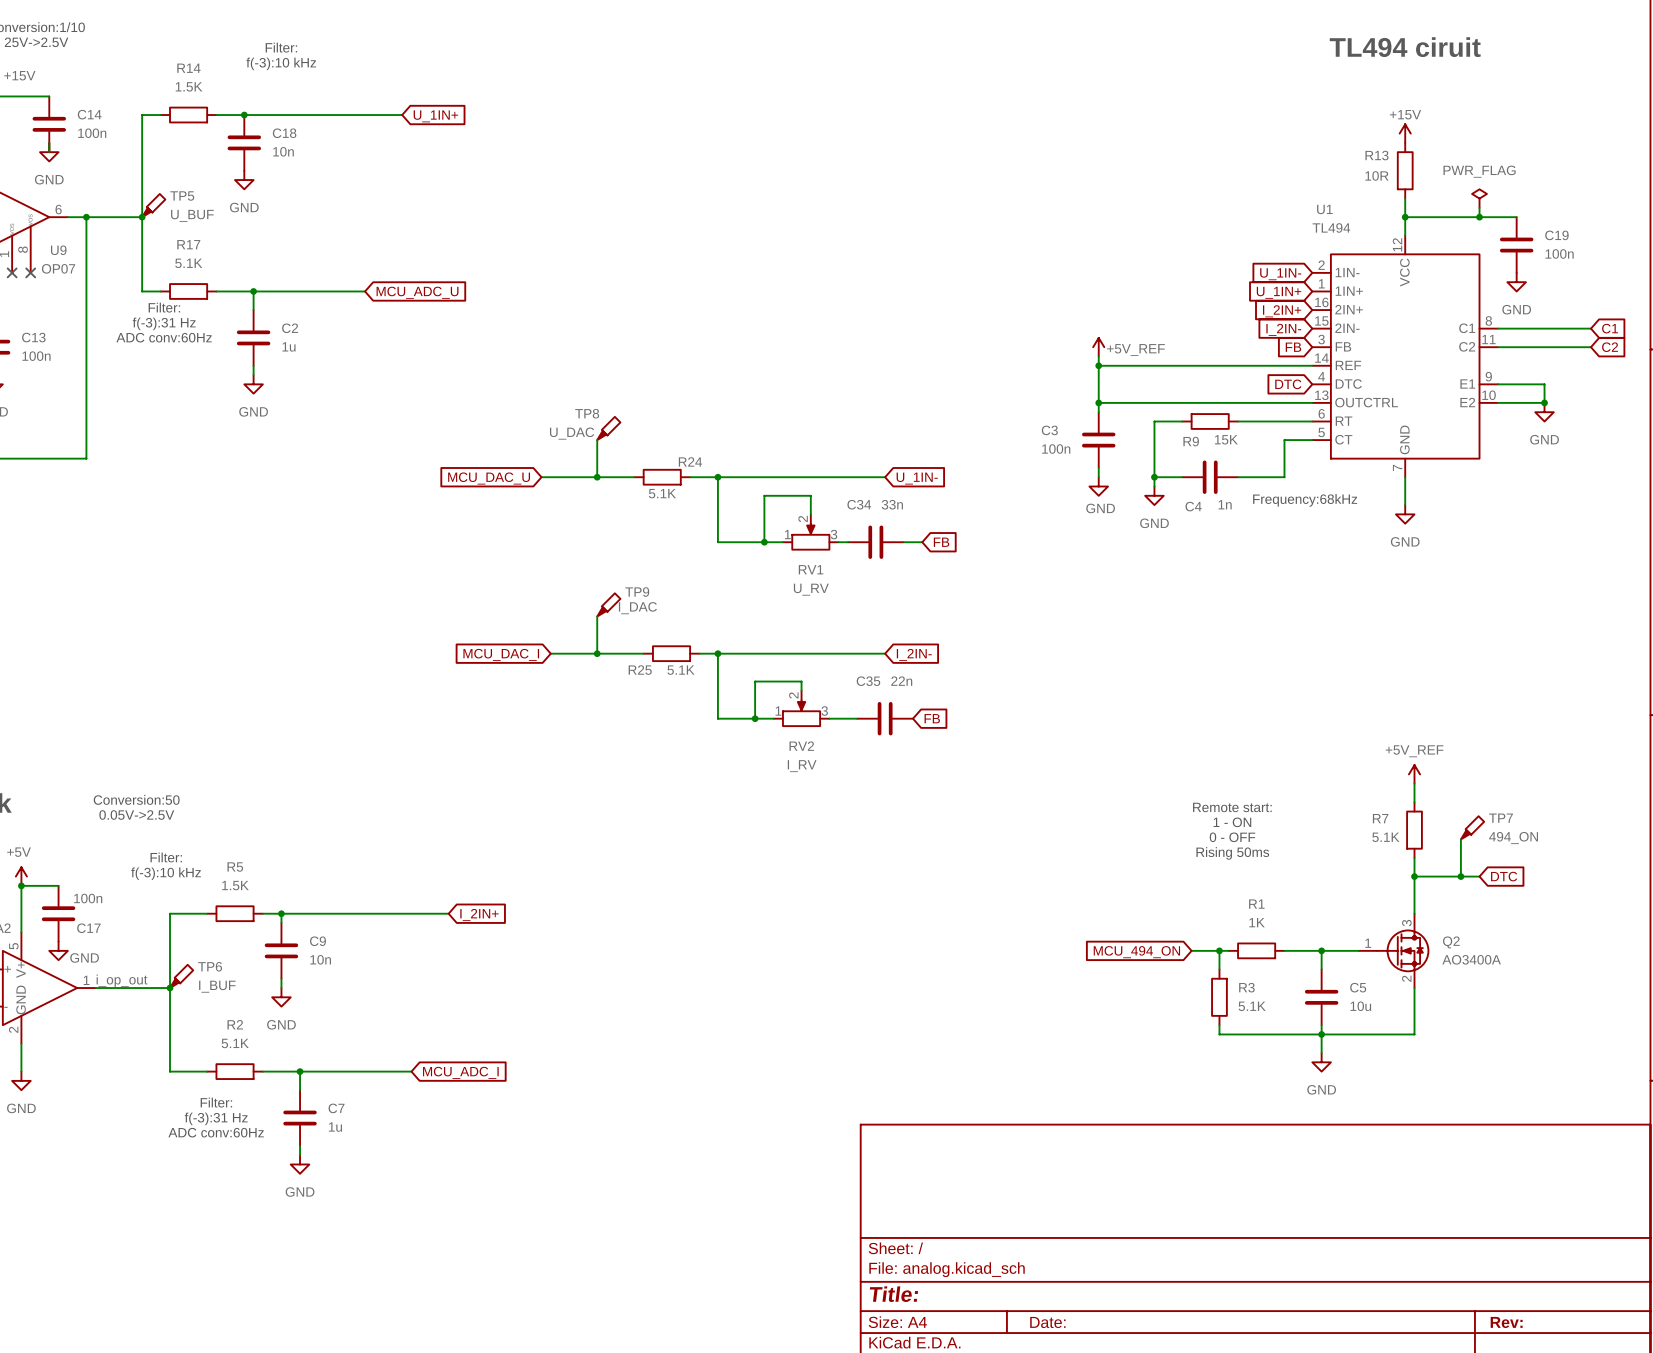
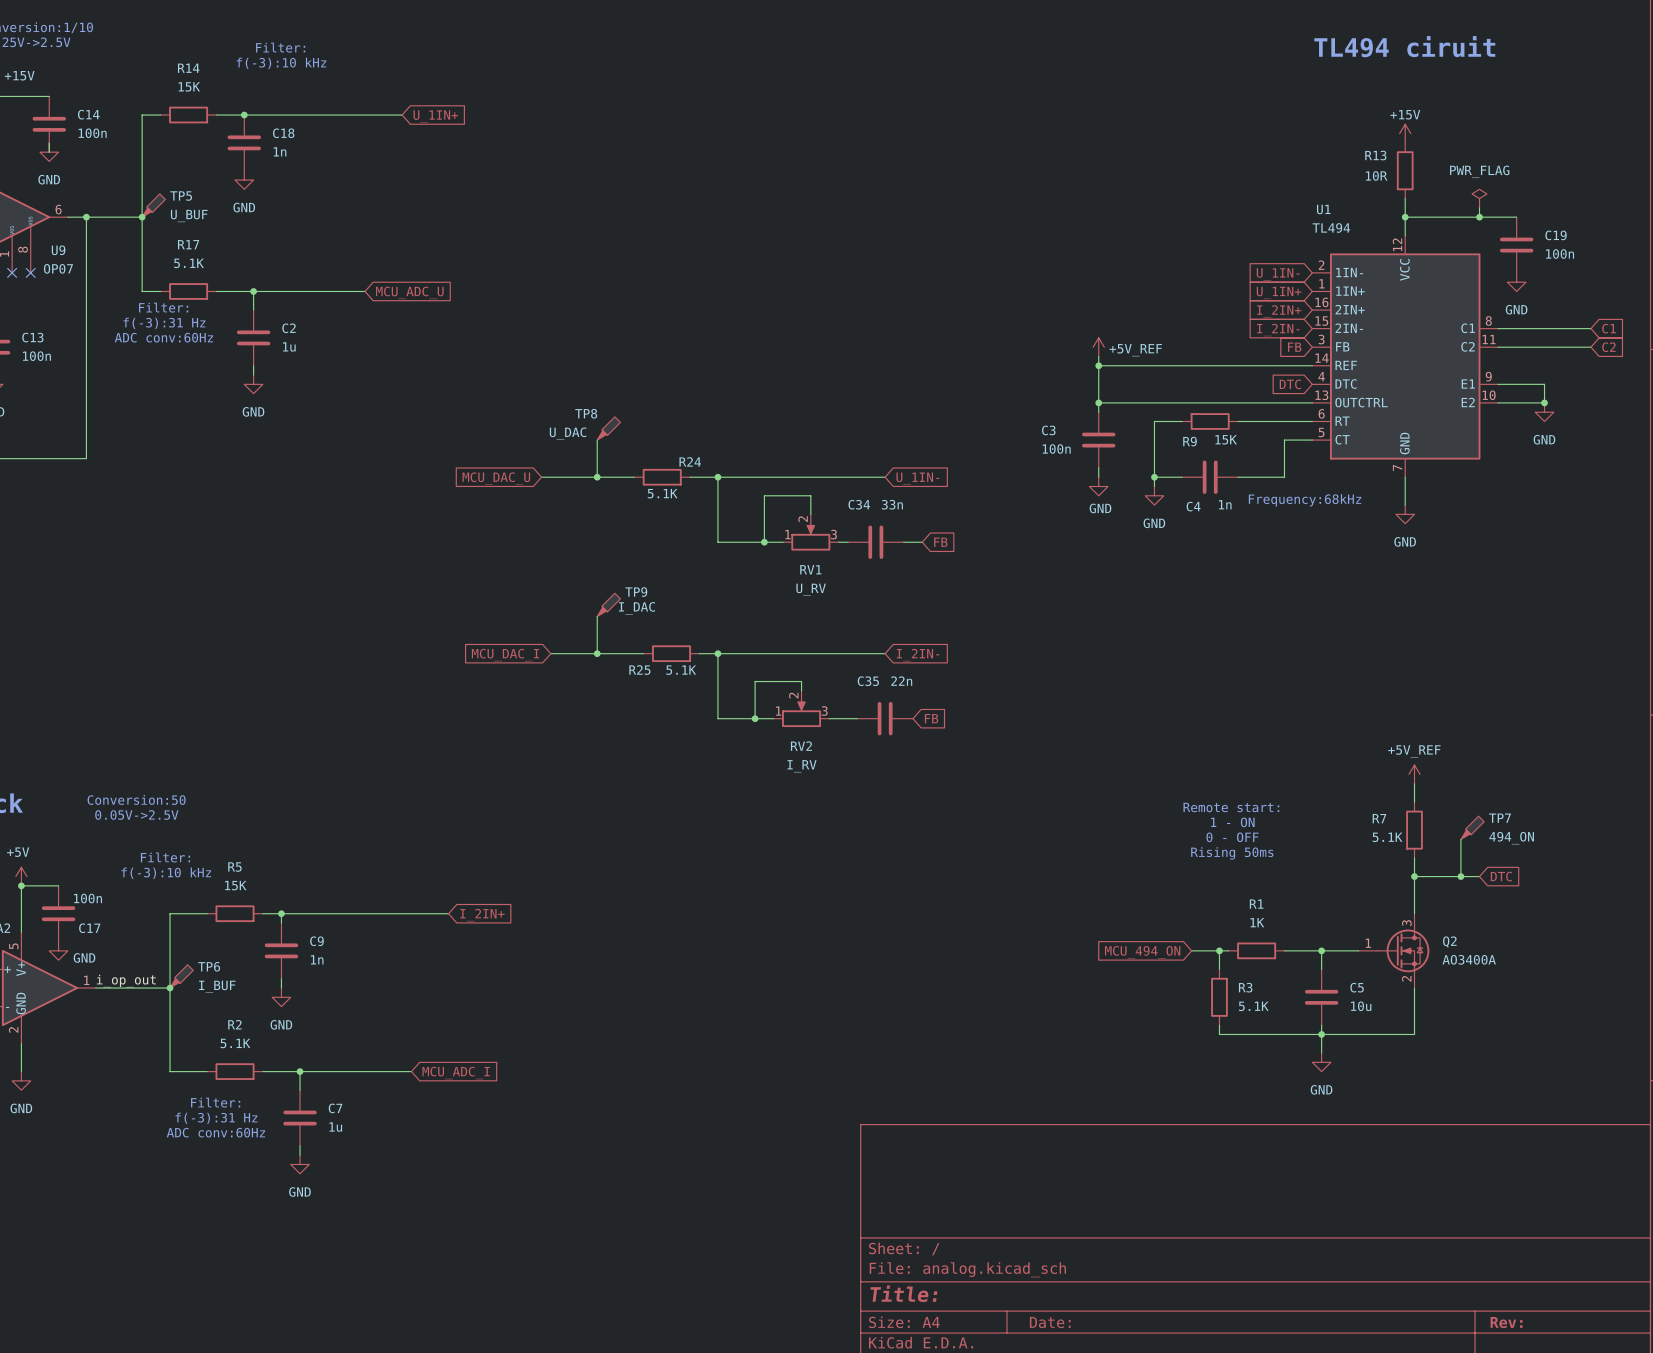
R14 value: 1.5K (189, 86) -> 15K (189, 86)
C18 value: 10n (283, 151) -> 1n (280, 151)
R5 value: 1.5K (235, 885) -> 15K (235, 885)
C9 value: 10n (320, 959) -> 1n (317, 959)

